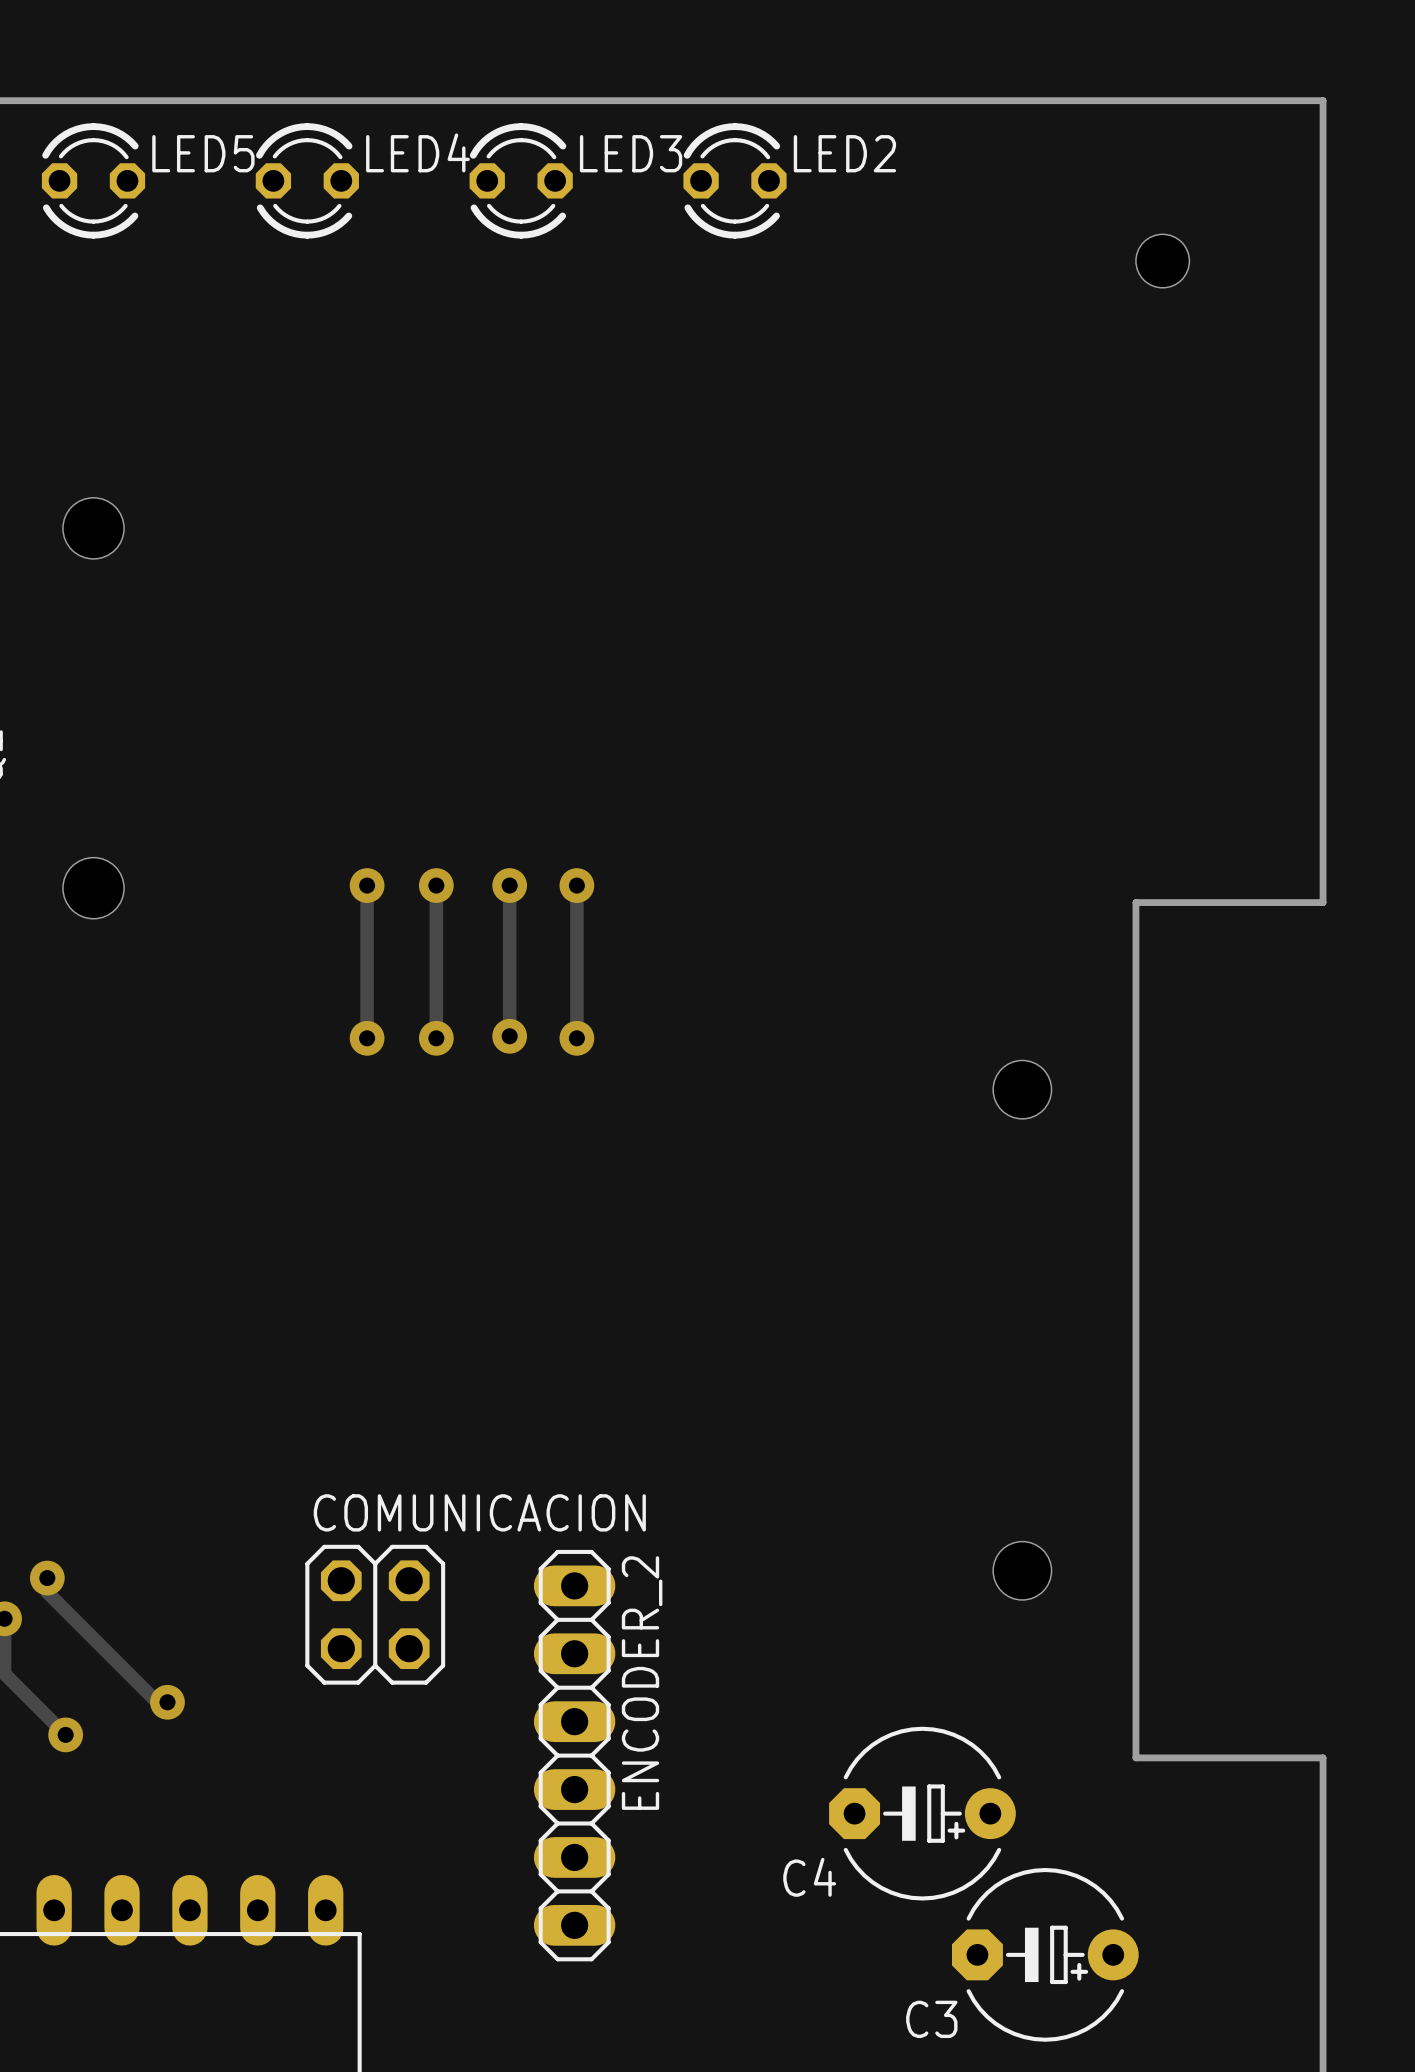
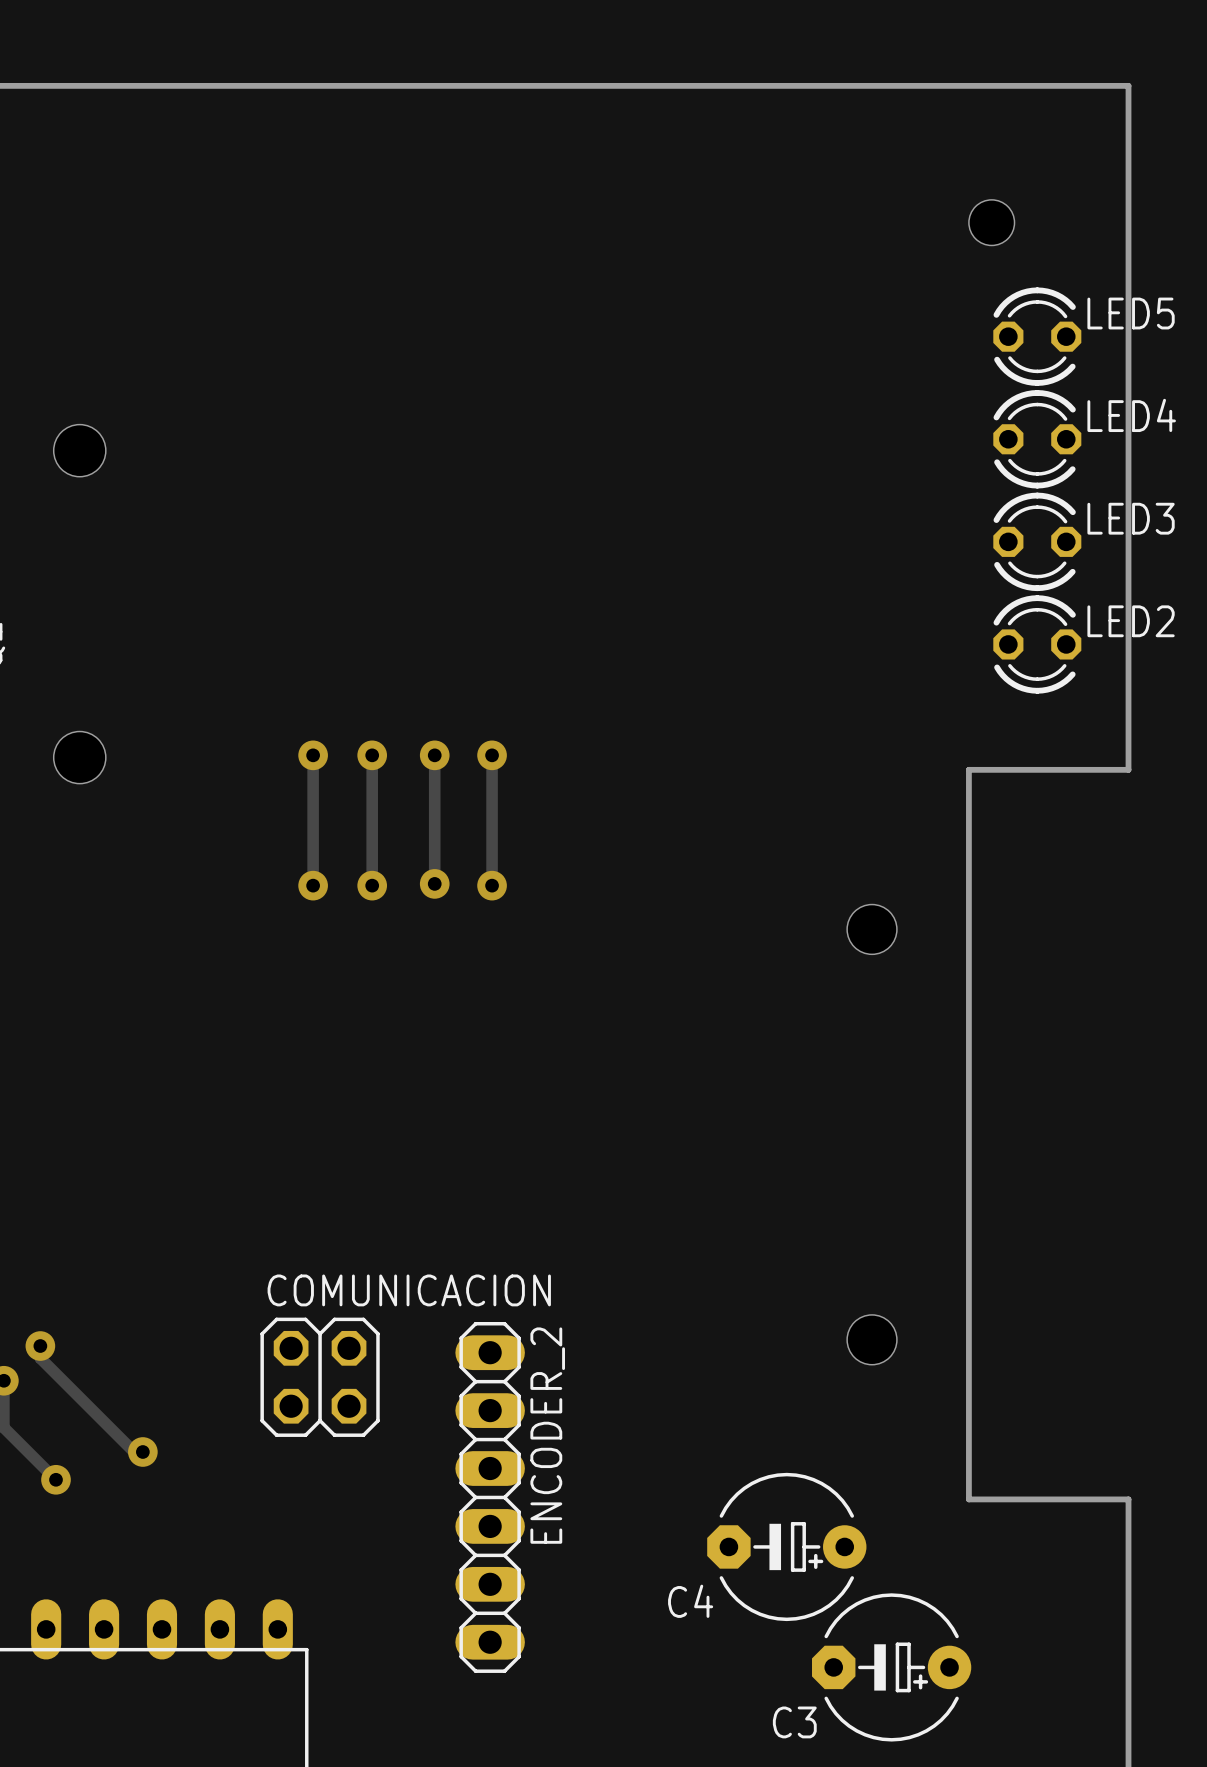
LED5 position: (93, 180) -> (1037, 336)
LED4 position: (307, 180) -> (1037, 439)
LED3 position: (521, 180) -> (1037, 541)
LED2 position: (735, 180) -> (1037, 644)

